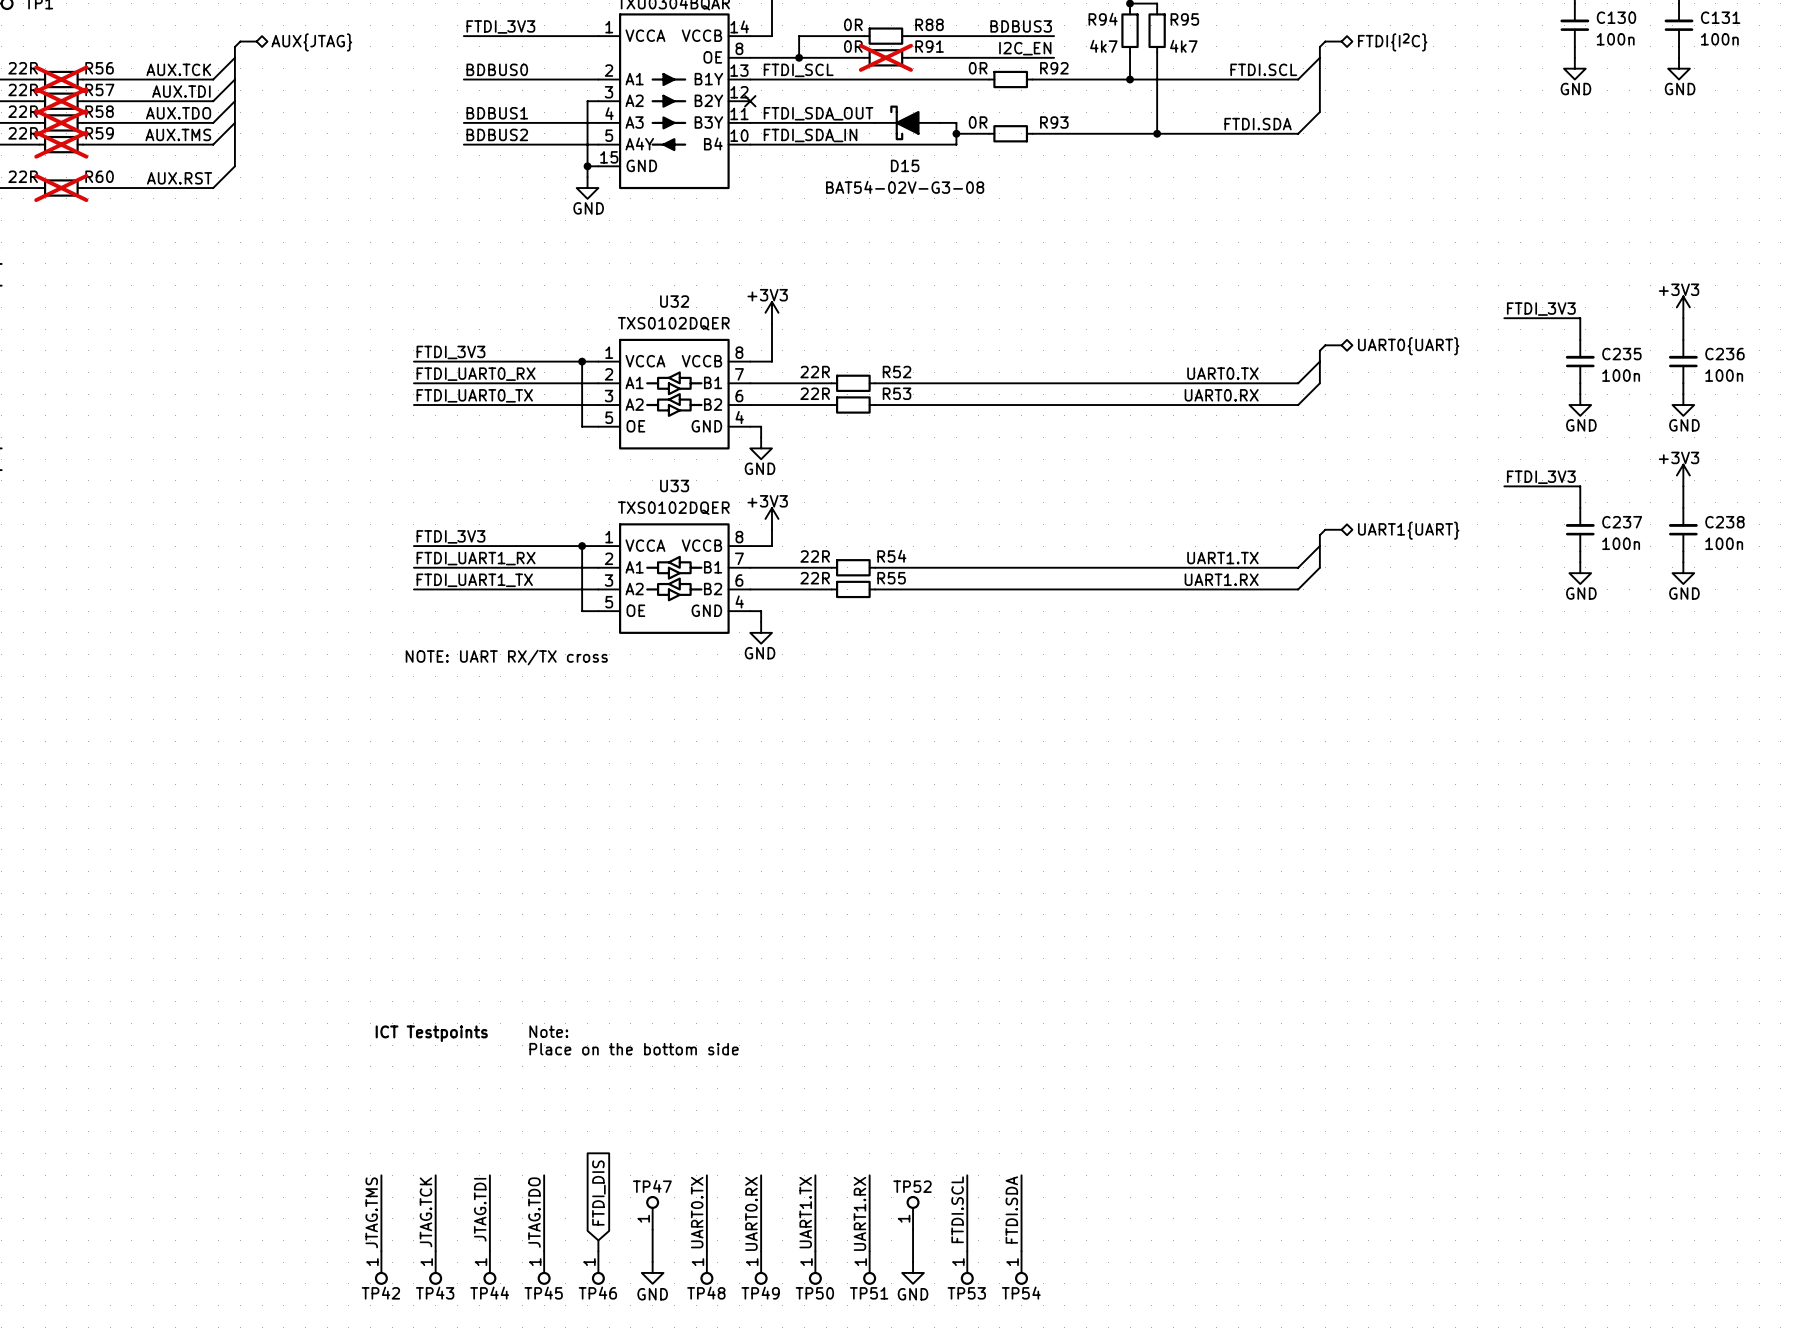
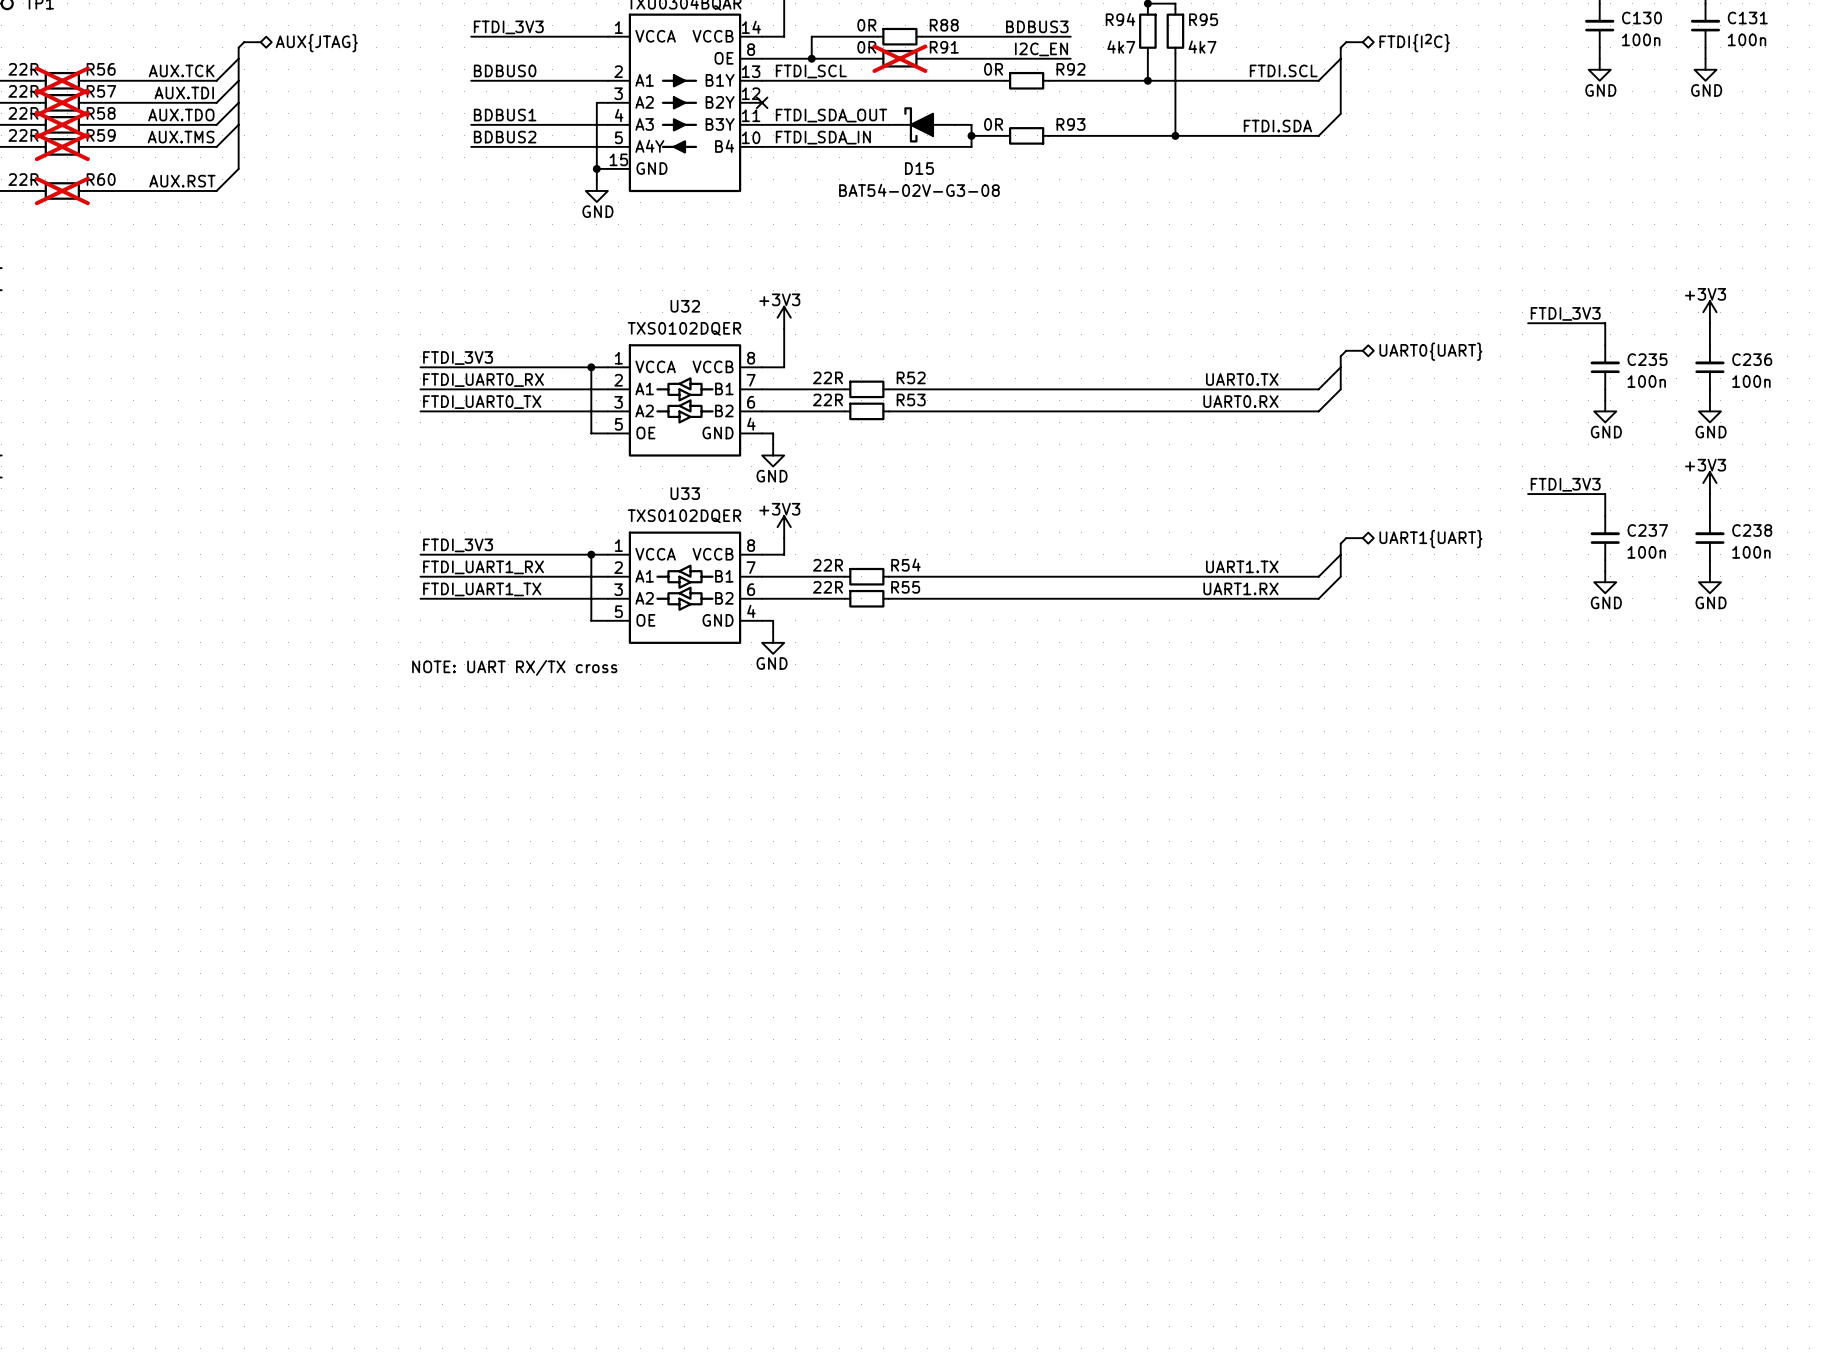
text: Note: (548, 1031) -> none
text: ICT Testpoints (431, 1033) -> none
text: Place on the bottom side (634, 1049) -> none
wire: (381, 1175) (381, 1251) -> none
wire: (435, 1175) (435, 1251) -> none
wire: (489, 1175) (489, 1251) -> none
wire: (544, 1175) (544, 1251) -> none
wire: (706, 1175) (706, 1251) -> none
wire: (761, 1175) (761, 1251) -> none
wire: (815, 1175) (815, 1251) -> none
wire: (869, 1175) (869, 1251) -> none
wire: (967, 1175) (967, 1251) -> none
wire: (1021, 1175) (1021, 1251) -> none
global label: FTDI_DIS (598, 1193) -> none
label: JTAG.TDI (480, 1209) -> none
label: FTDI.SCL (957, 1209) -> none
label: FTDI.SDA (1011, 1210) -> none
label: JTAG.TMS (371, 1212) -> none
label: JTAG.TCK (425, 1212) -> none
label: JTAG.TDO (534, 1212) -> none
TP47: (652, 1212) -> none
label: UART0.TX (697, 1212) -> none
label: UART1.TX (805, 1212) -> none
TP52: (913, 1212) -> none
label: UART0.RX (751, 1213) -> none
label: UART1.RX (859, 1213) -> none
wire: (652, 1229) (652, 1262) -> none
wire: (913, 1229) (913, 1262) -> none
wire: (598, 1240) (598, 1251) -> none
TP42: (381, 1268) -> none
TP43: (435, 1268) -> none
TP44: (489, 1268) -> none
TP45: (544, 1268) -> none
TP46: (598, 1268) -> none
TP48: (706, 1268) -> none
TP49: (761, 1268) -> none
TP50: (815, 1268) -> none
TP51: (869, 1268) -> none
TP53: (967, 1268) -> none
TP54: (1021, 1268) -> none
power symbol: GND (652, 1272) -> none
power symbol: GND (913, 1272) -> none

